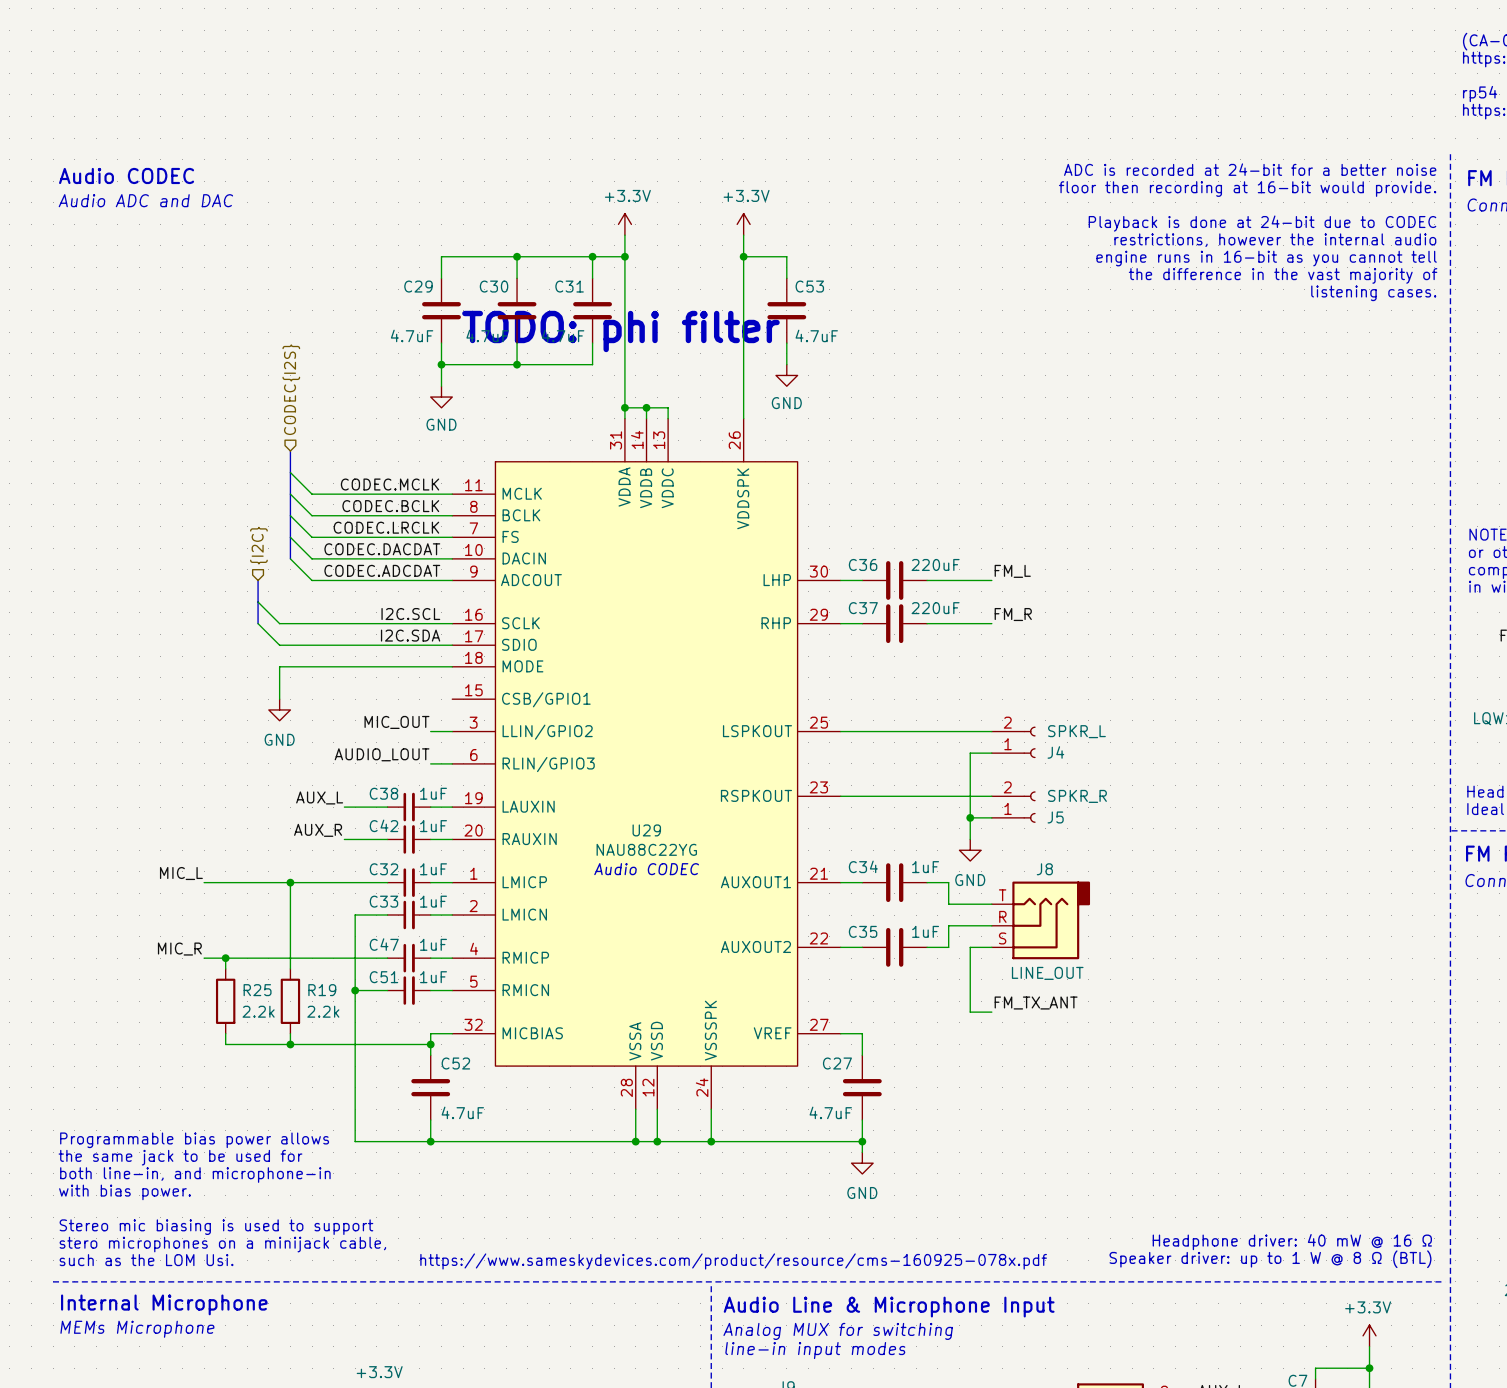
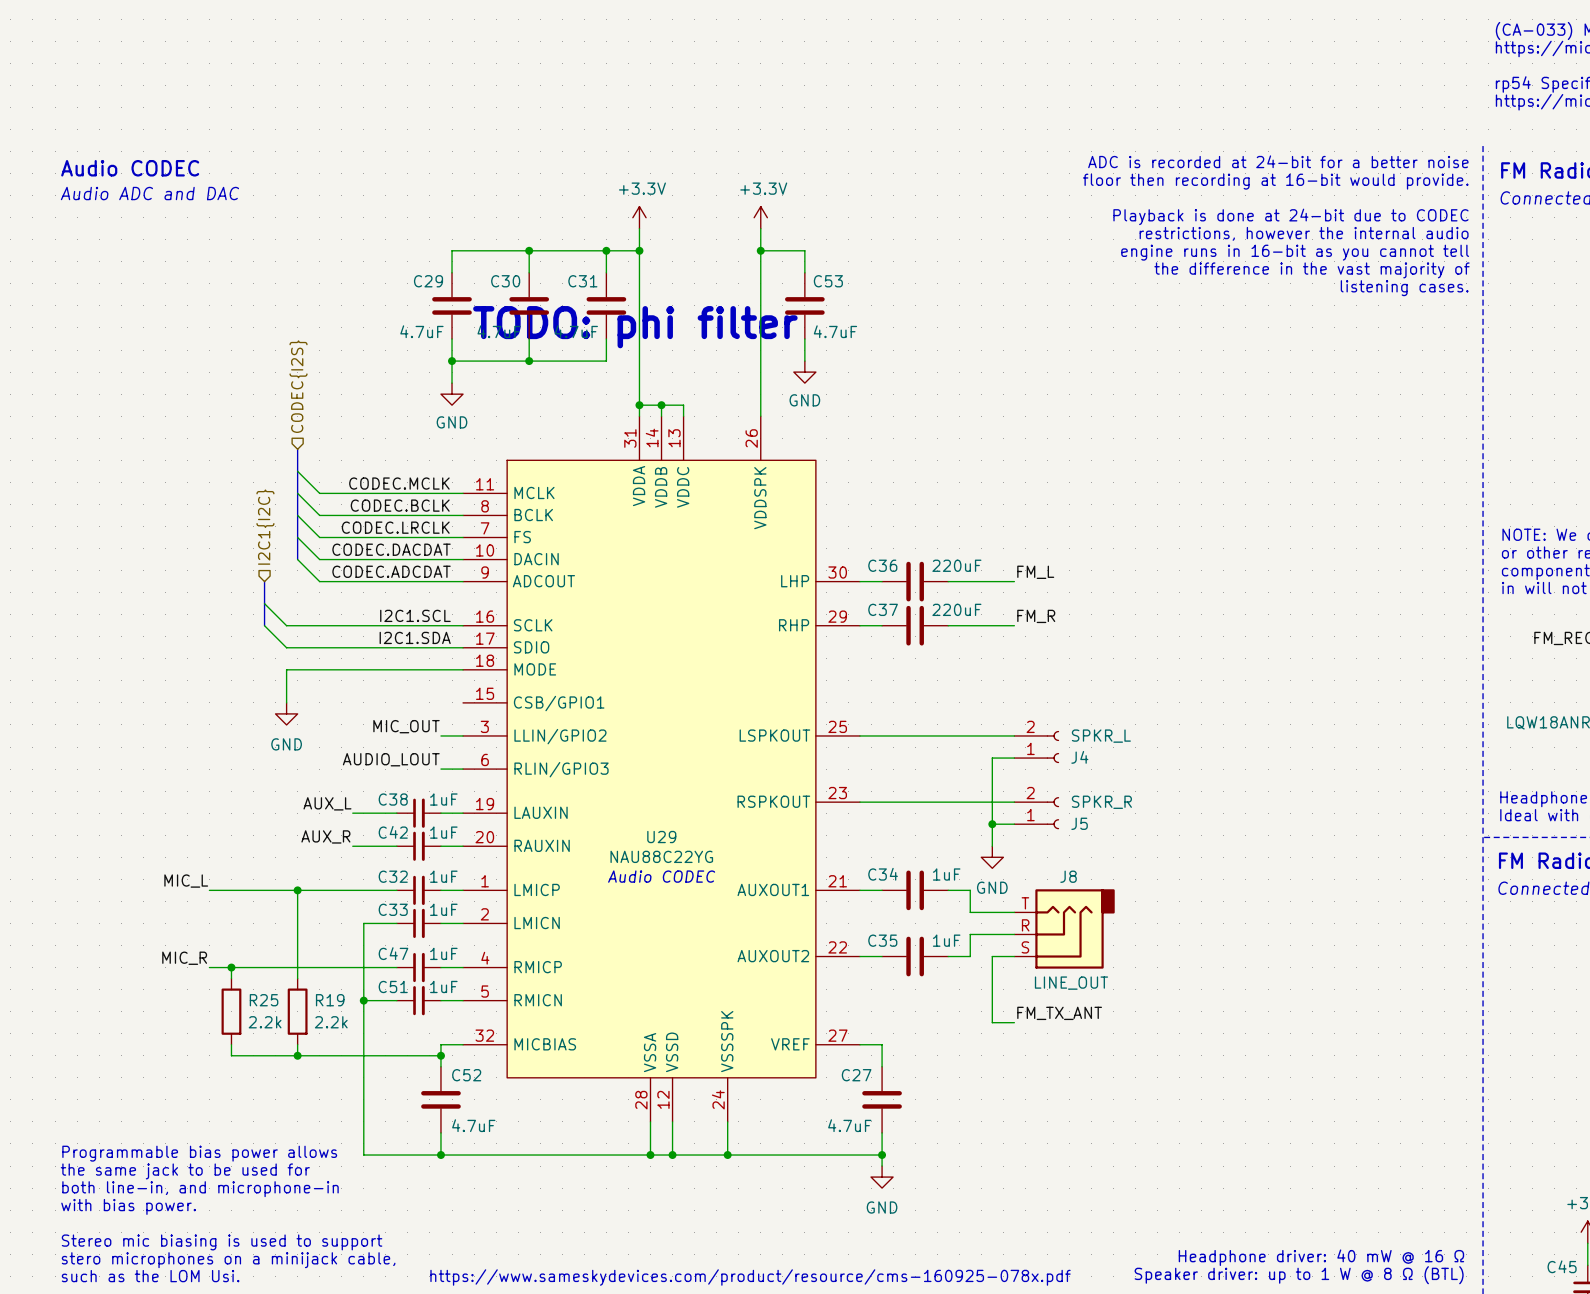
hierarchical label: {I2C} (258, 545) -> I2C1{I2C} (265, 527)
label: I2C.SCL (410, 614) -> I2C1.SCL (415, 615)
label: I2C.SDA (410, 635) -> I2C1.SDA (415, 637)

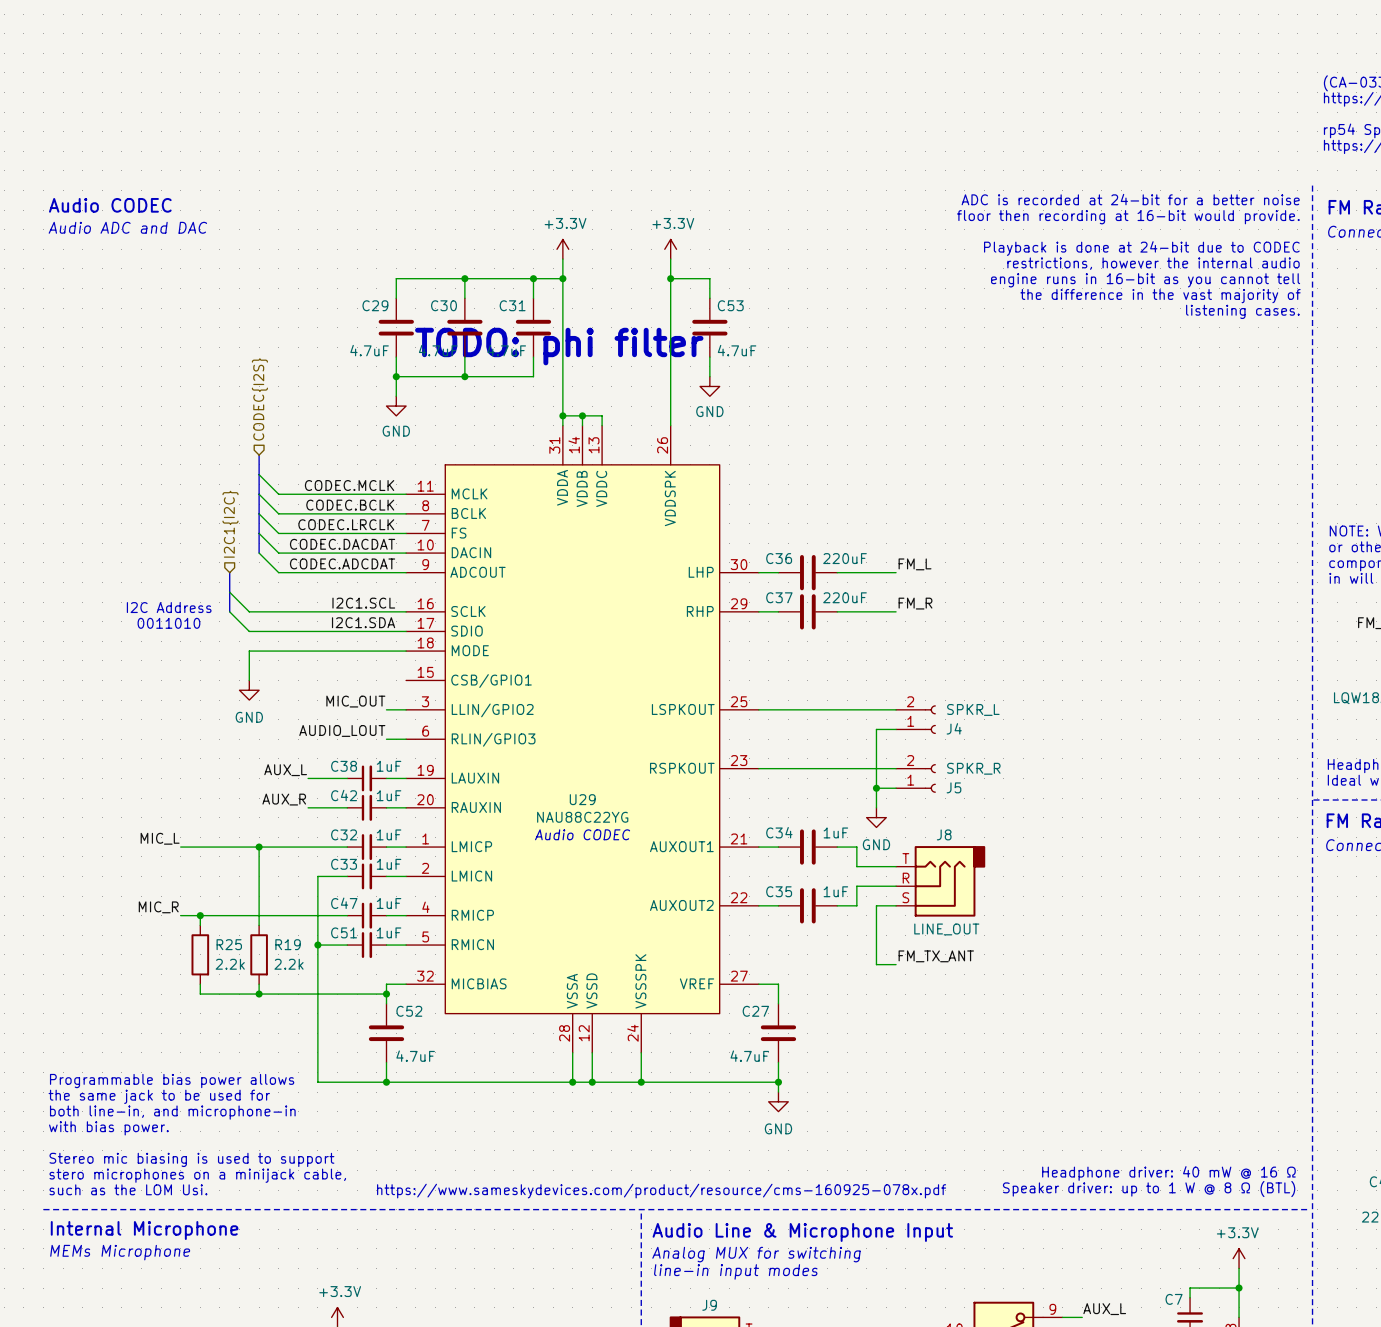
text: none -> I2C Address (169, 607)
text: none -> 0011010 (168, 623)

